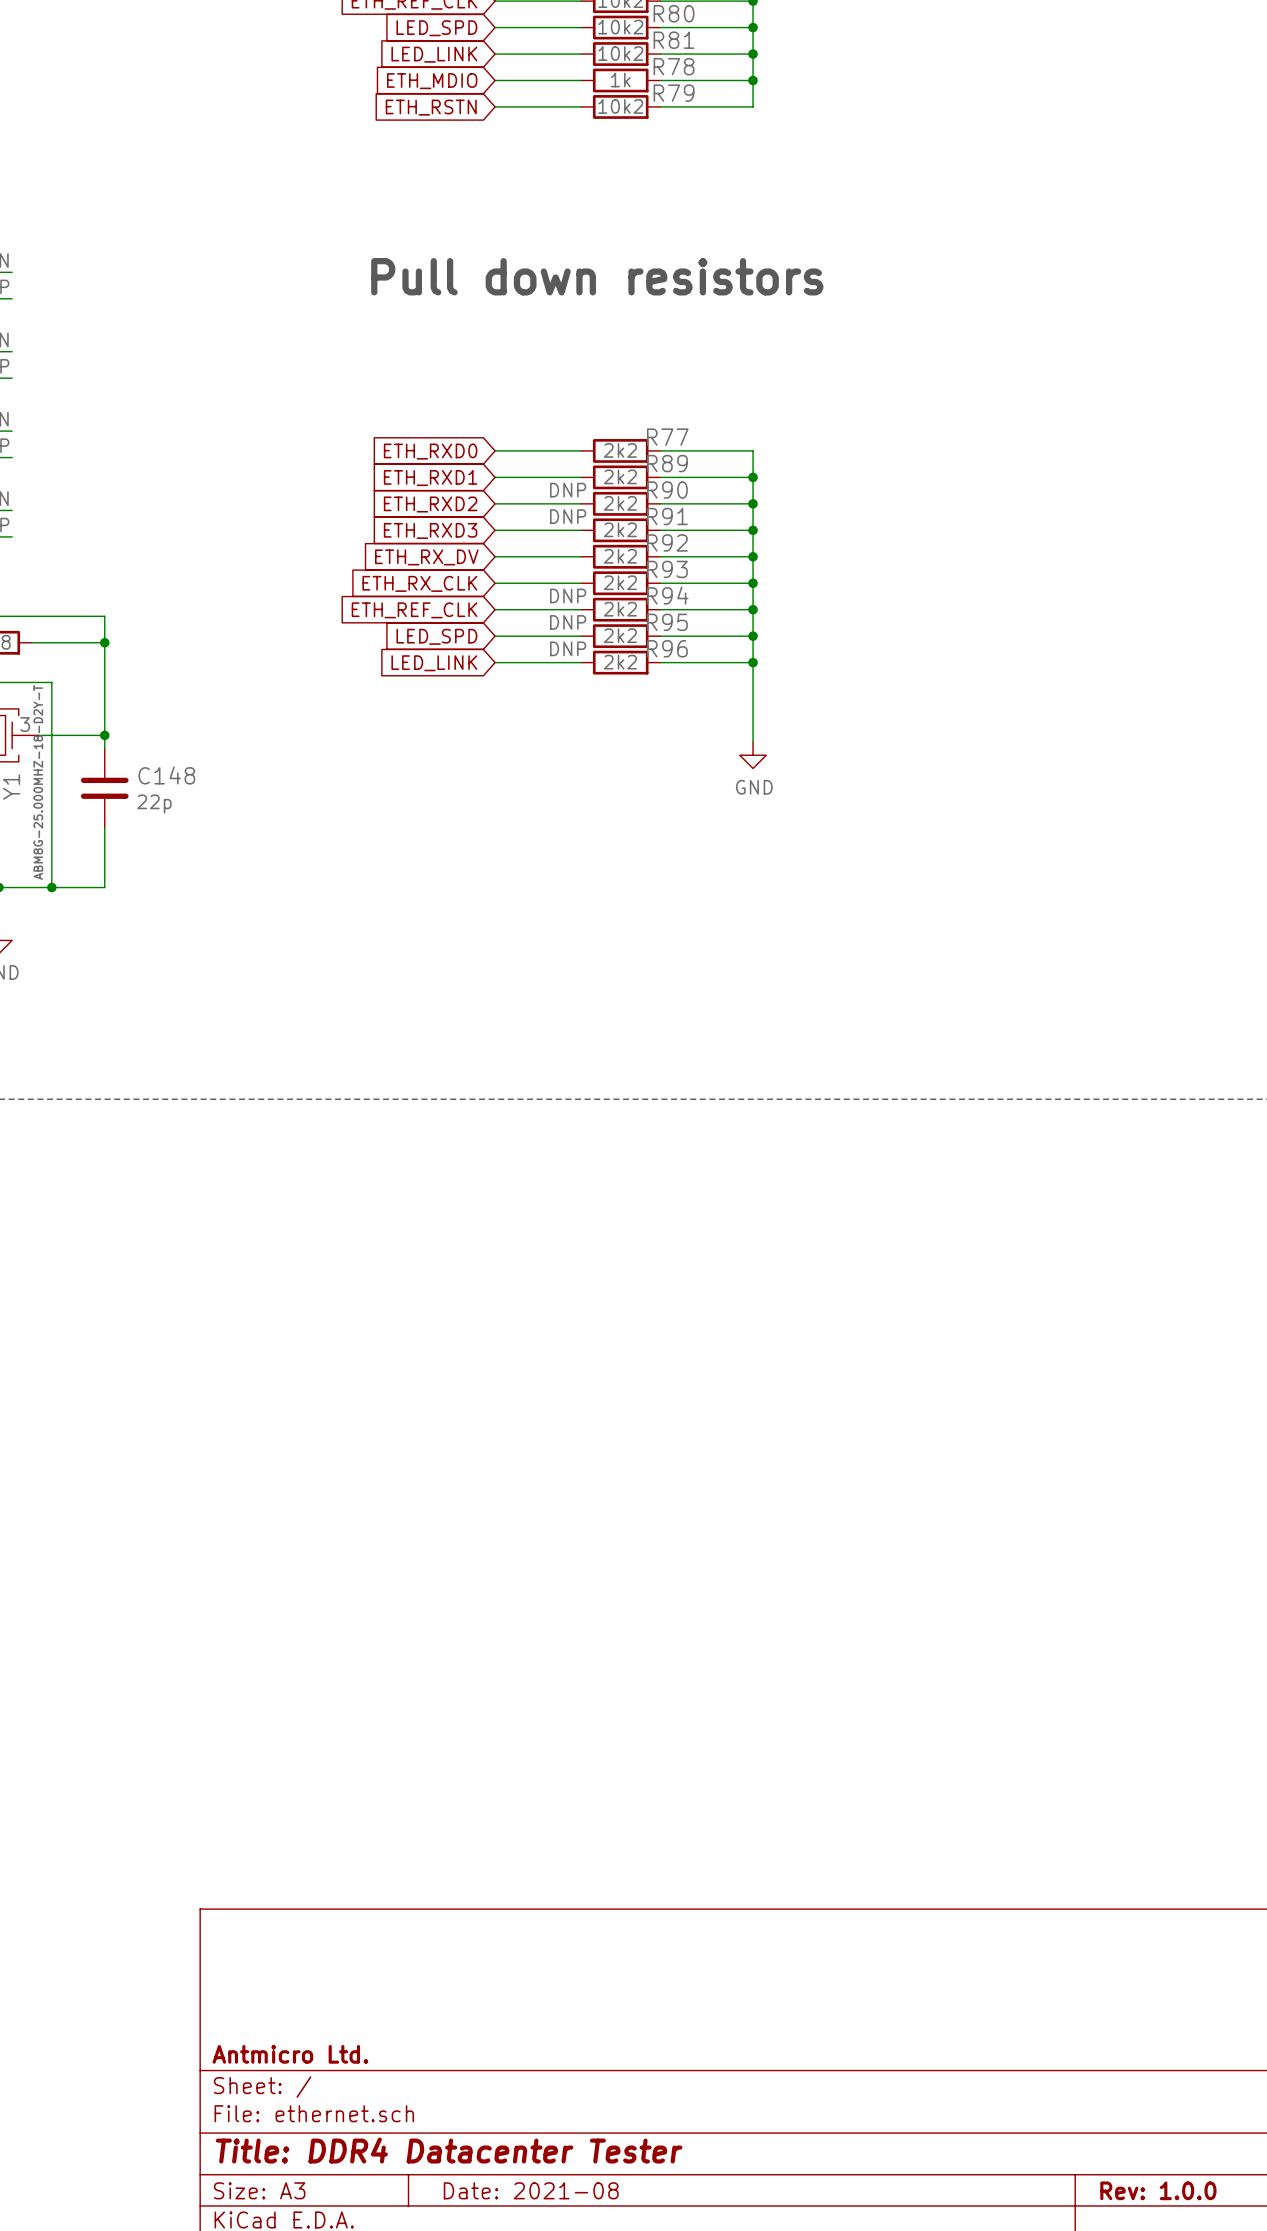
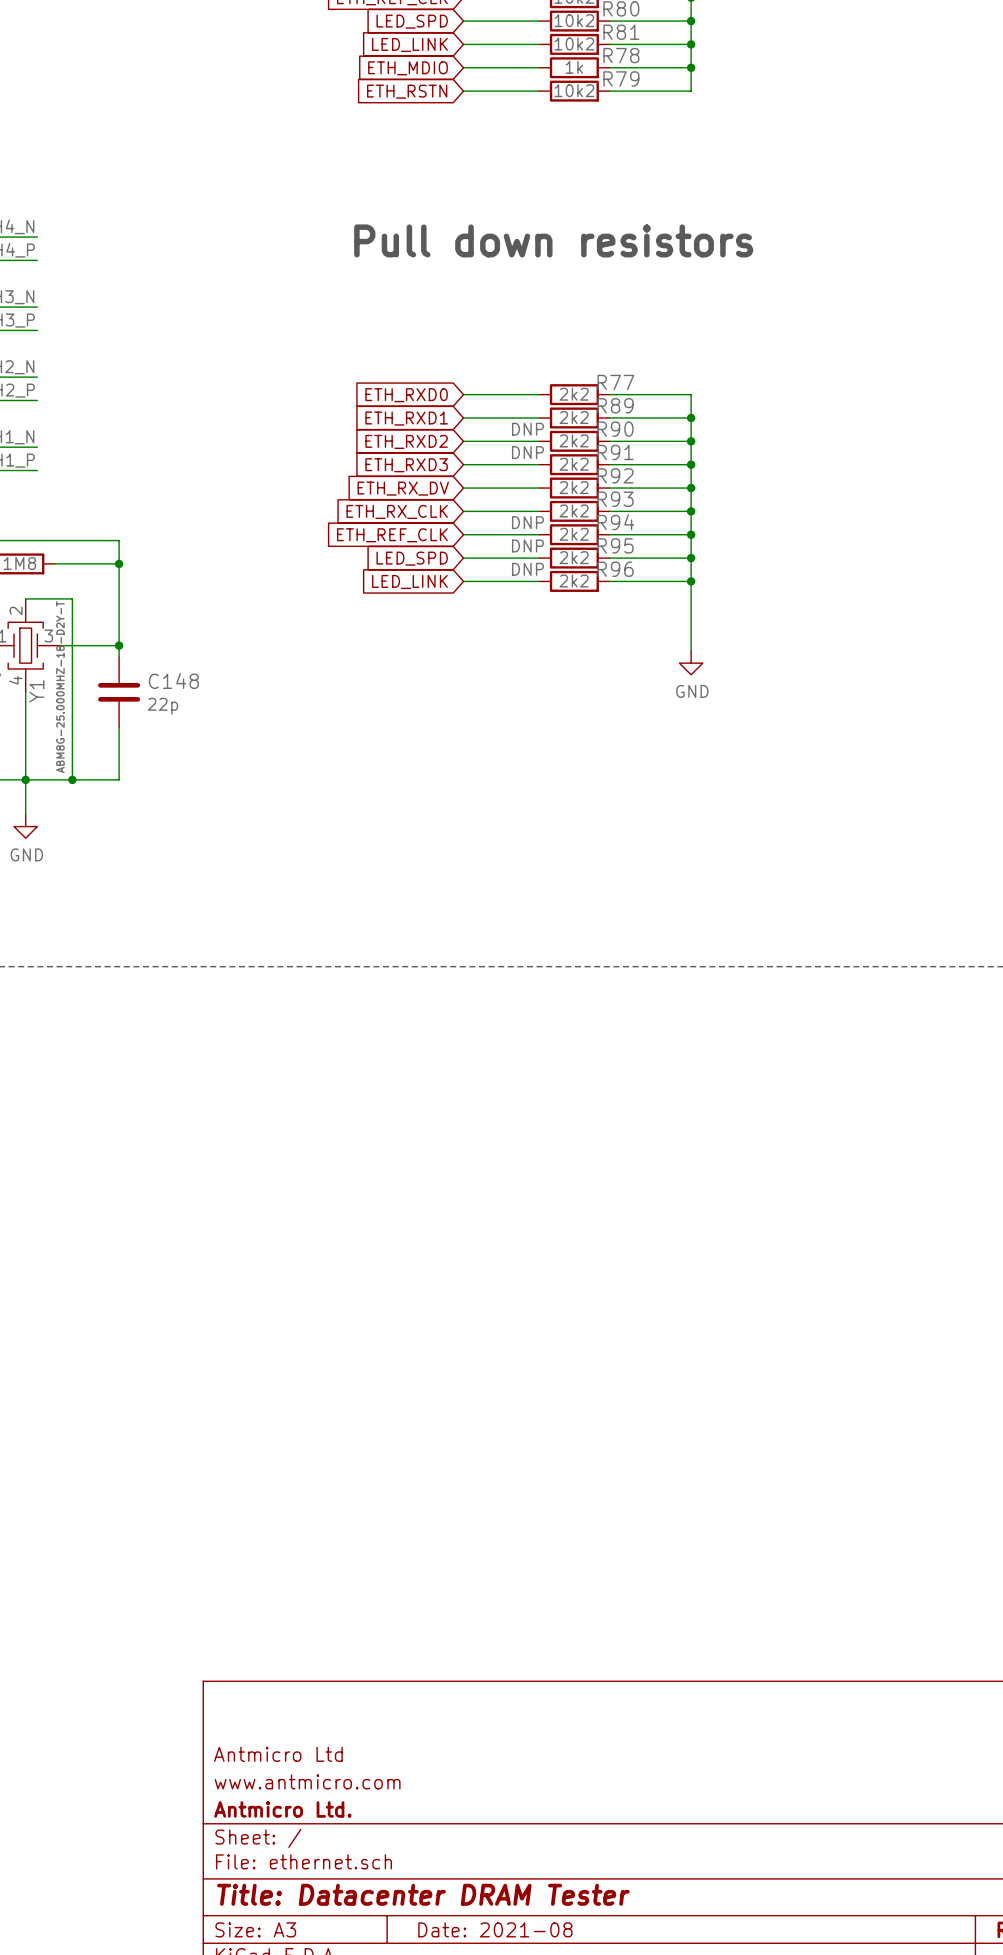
title block: none -> Antmicro Ltd (278, 1754)
title block: none -> www.antmicro.com (307, 1781)
title block: Title: DDR4 Datacenter Tester (449, 2150) -> Title: Datacenter DRAM Tester (423, 1894)

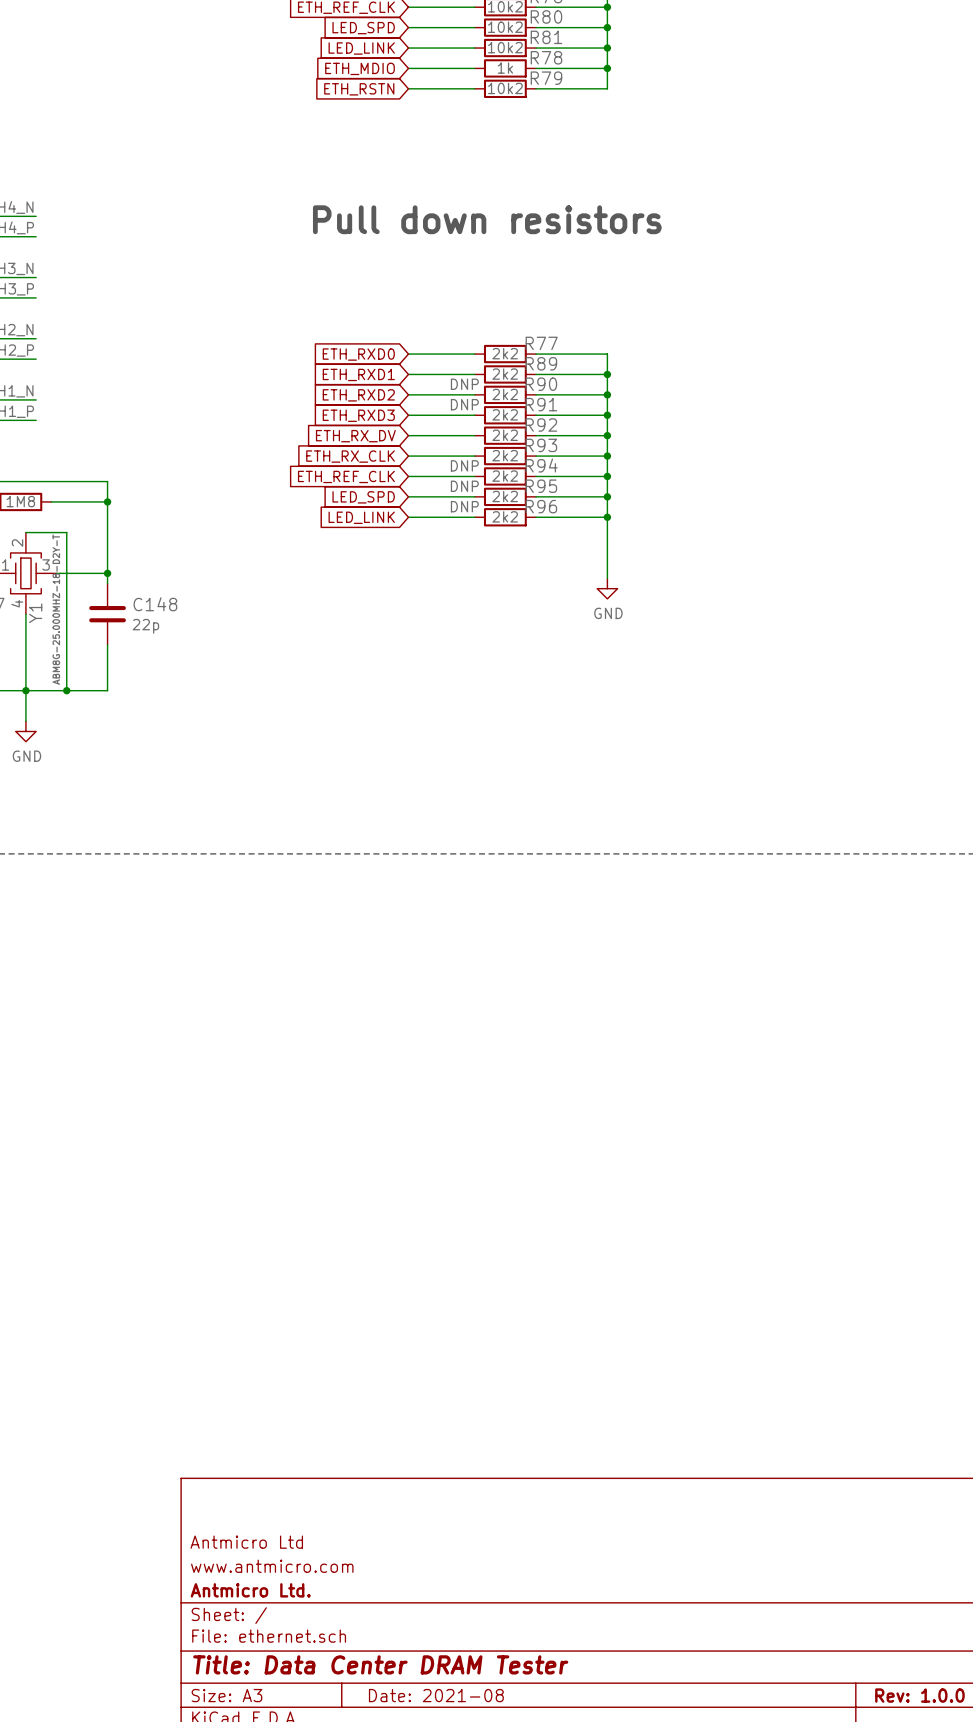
title block: Title: Datacenter DRAM Tester (423, 1894) -> Title: Data Center DRAM Tester (380, 1664)

